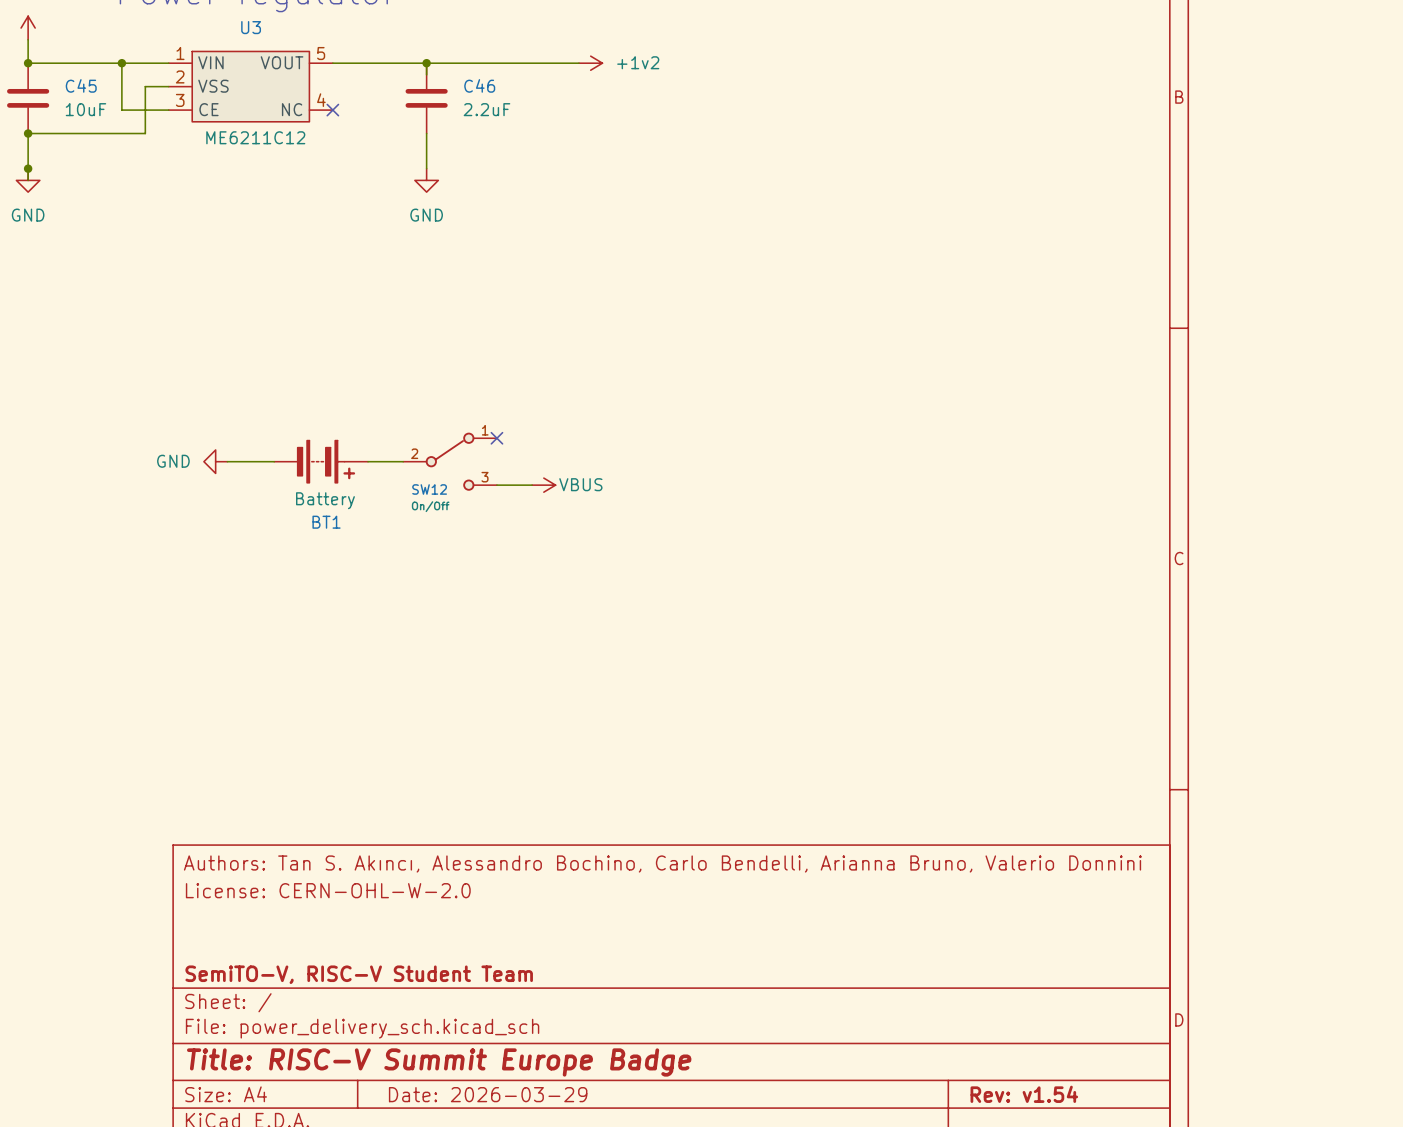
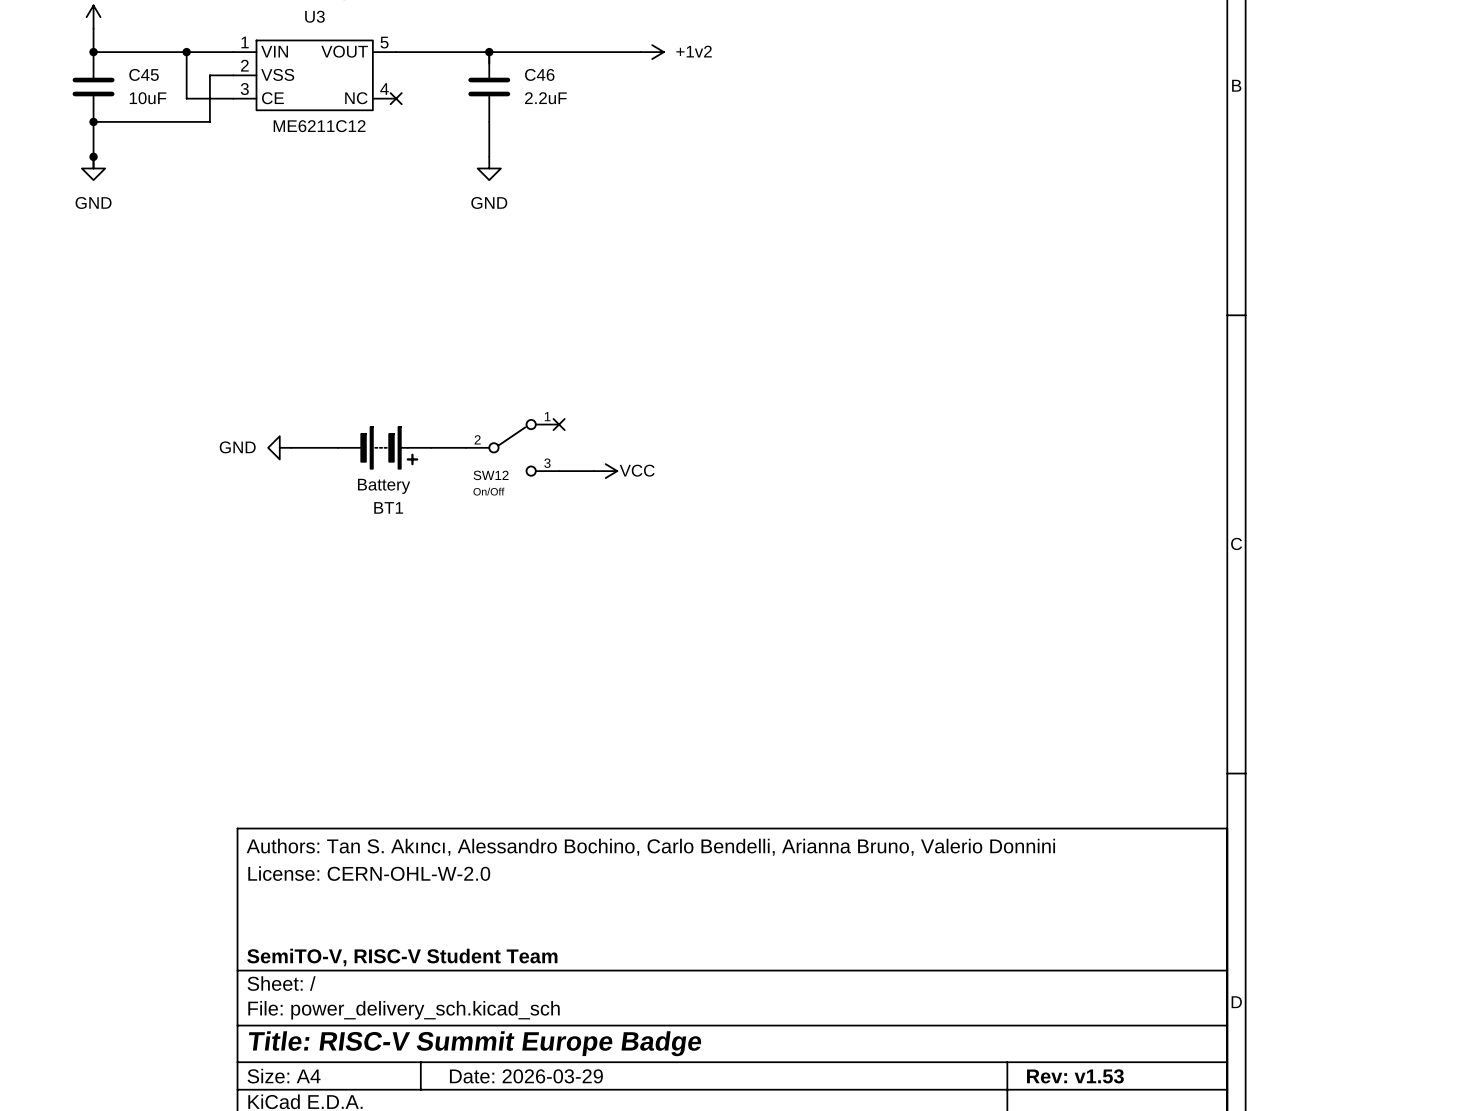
power symbol: VBUS (543, 485) -> VCC (605, 471)
title block: Rev: v1.54 (1024, 1094) -> Rev: v1.53 (1075, 1076)

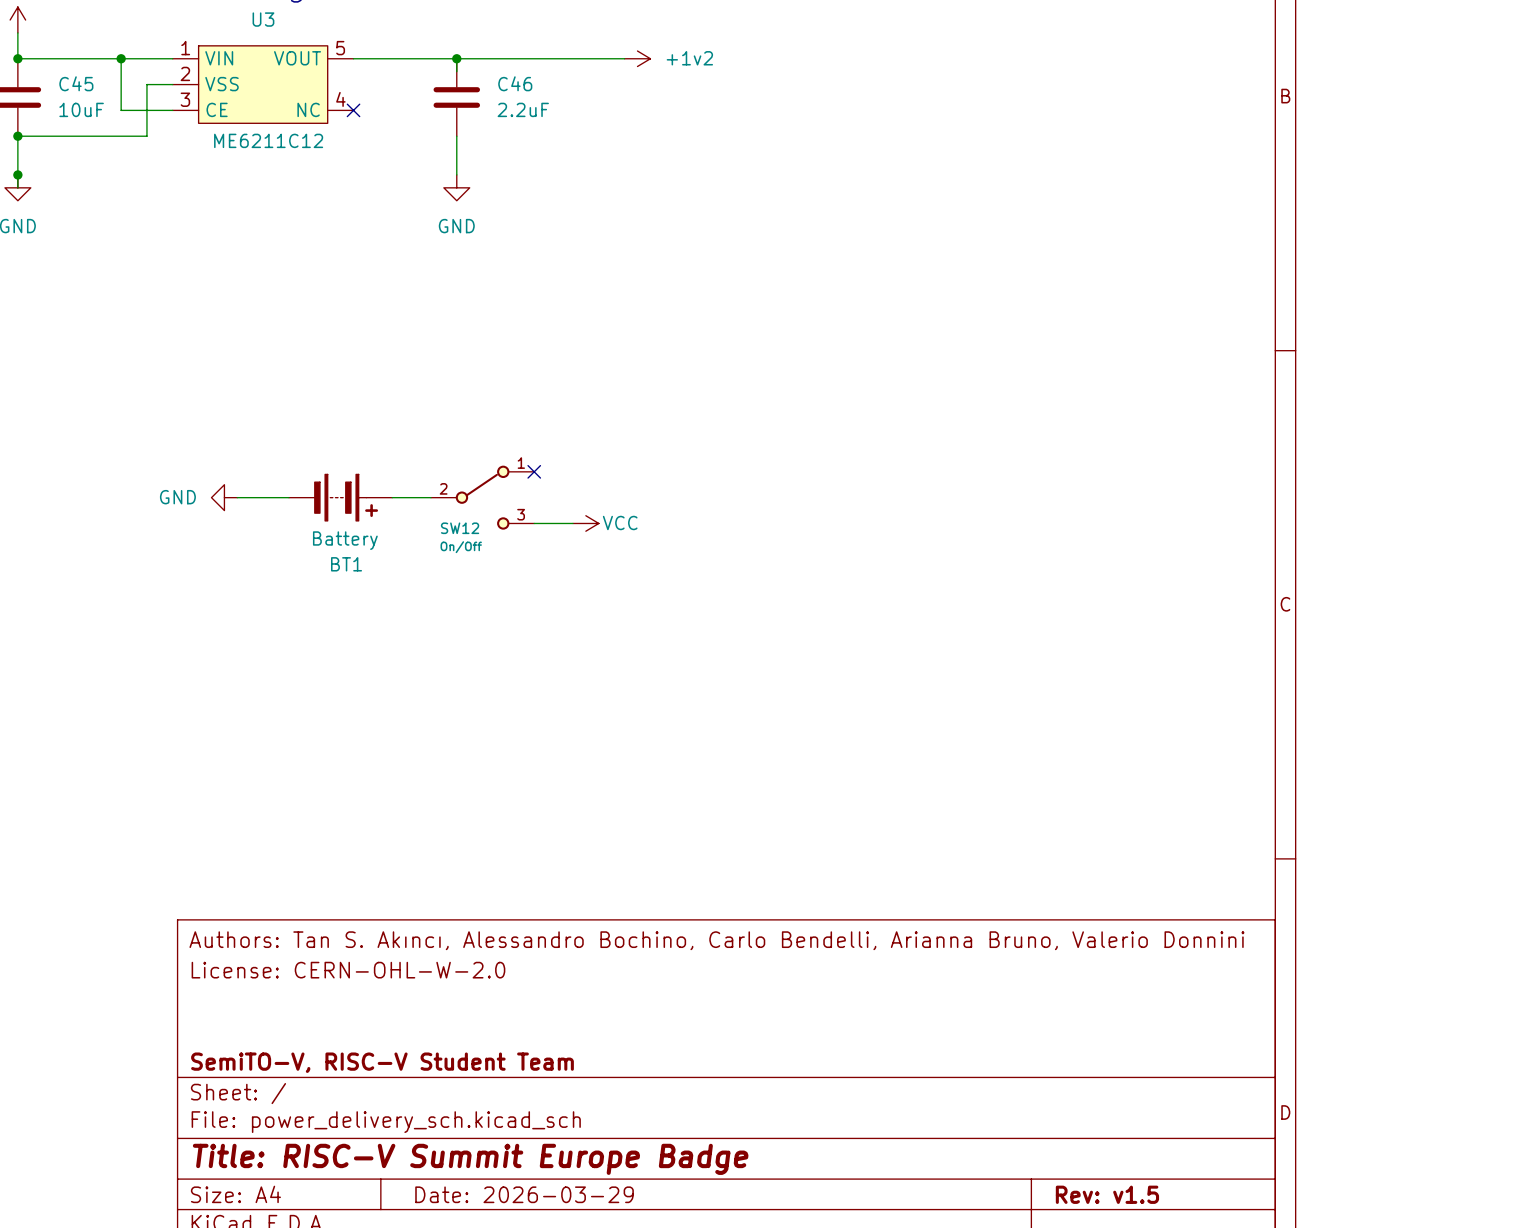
title block: Rev: v1.53 (1075, 1076) -> Rev: v1.5 (1107, 1194)

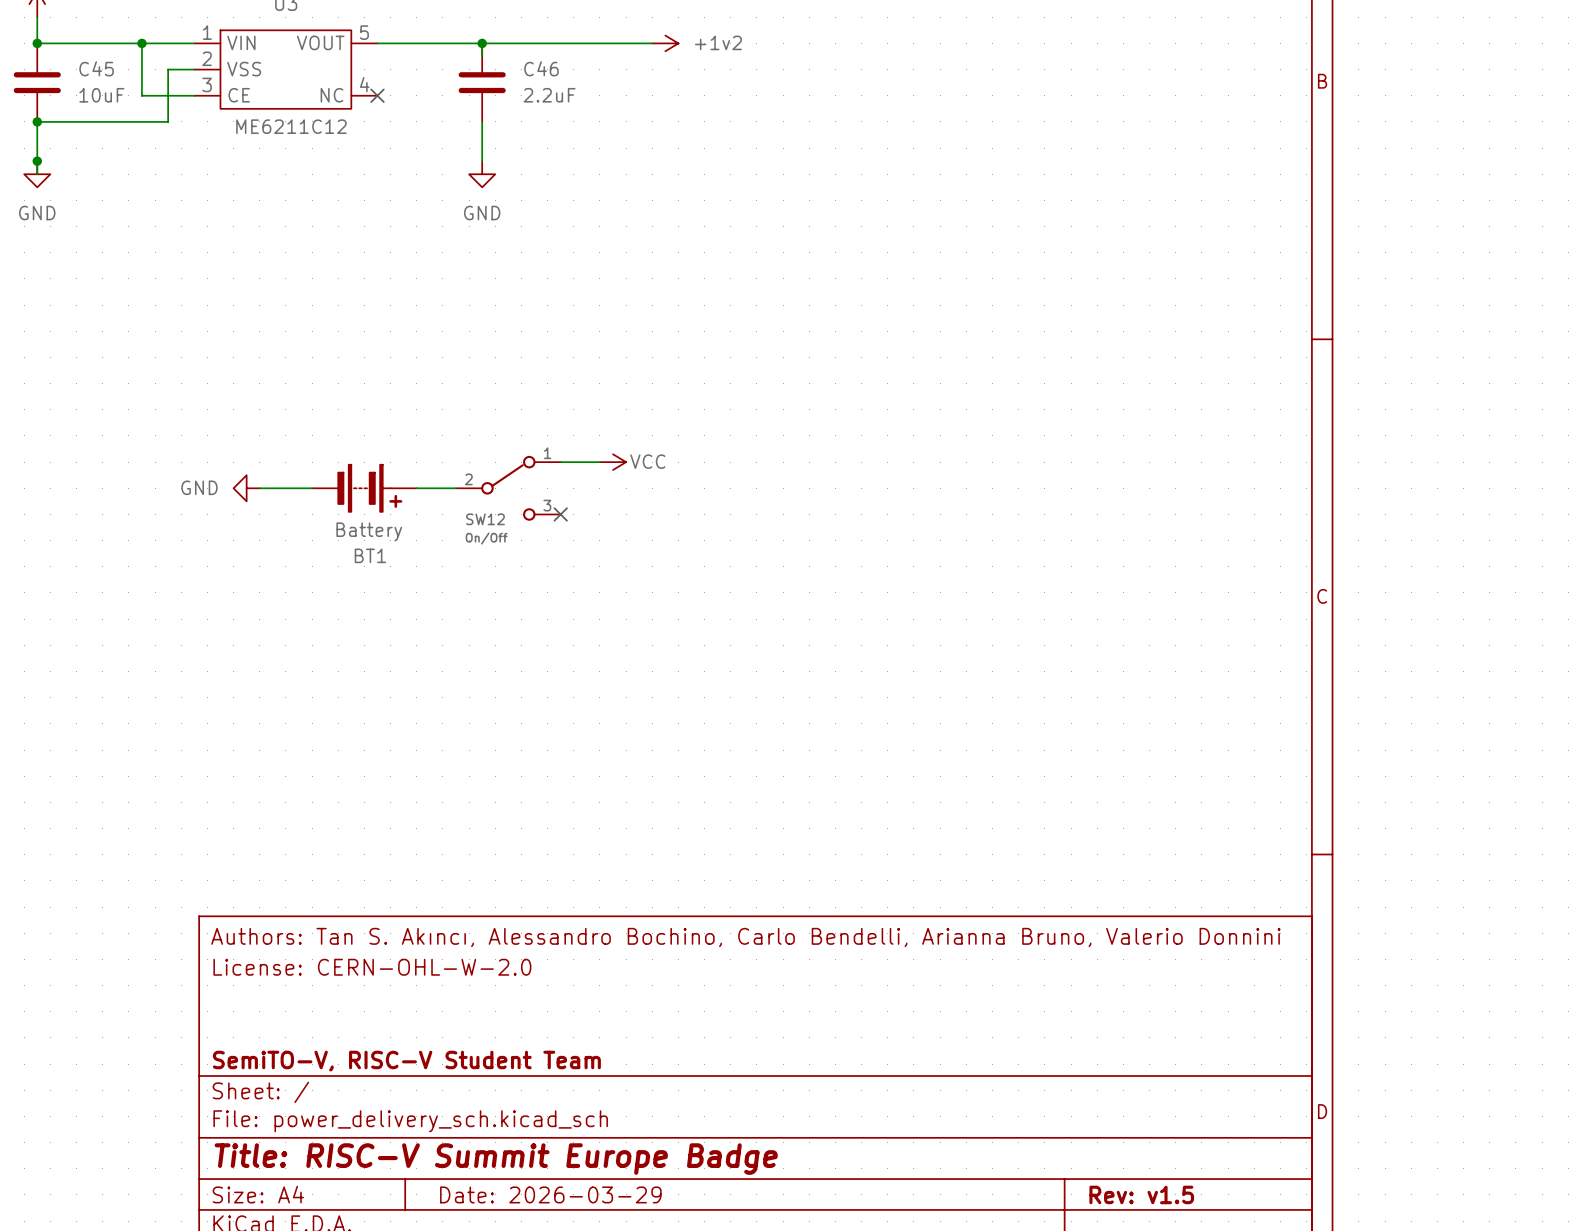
no-connect mark position: (534, 471) -> (560, 514)
wire: (534, 523) (572, 523) -> (560, 462) (599, 462)
power symbol position: VCC (585, 523) -> VCC (613, 462)

